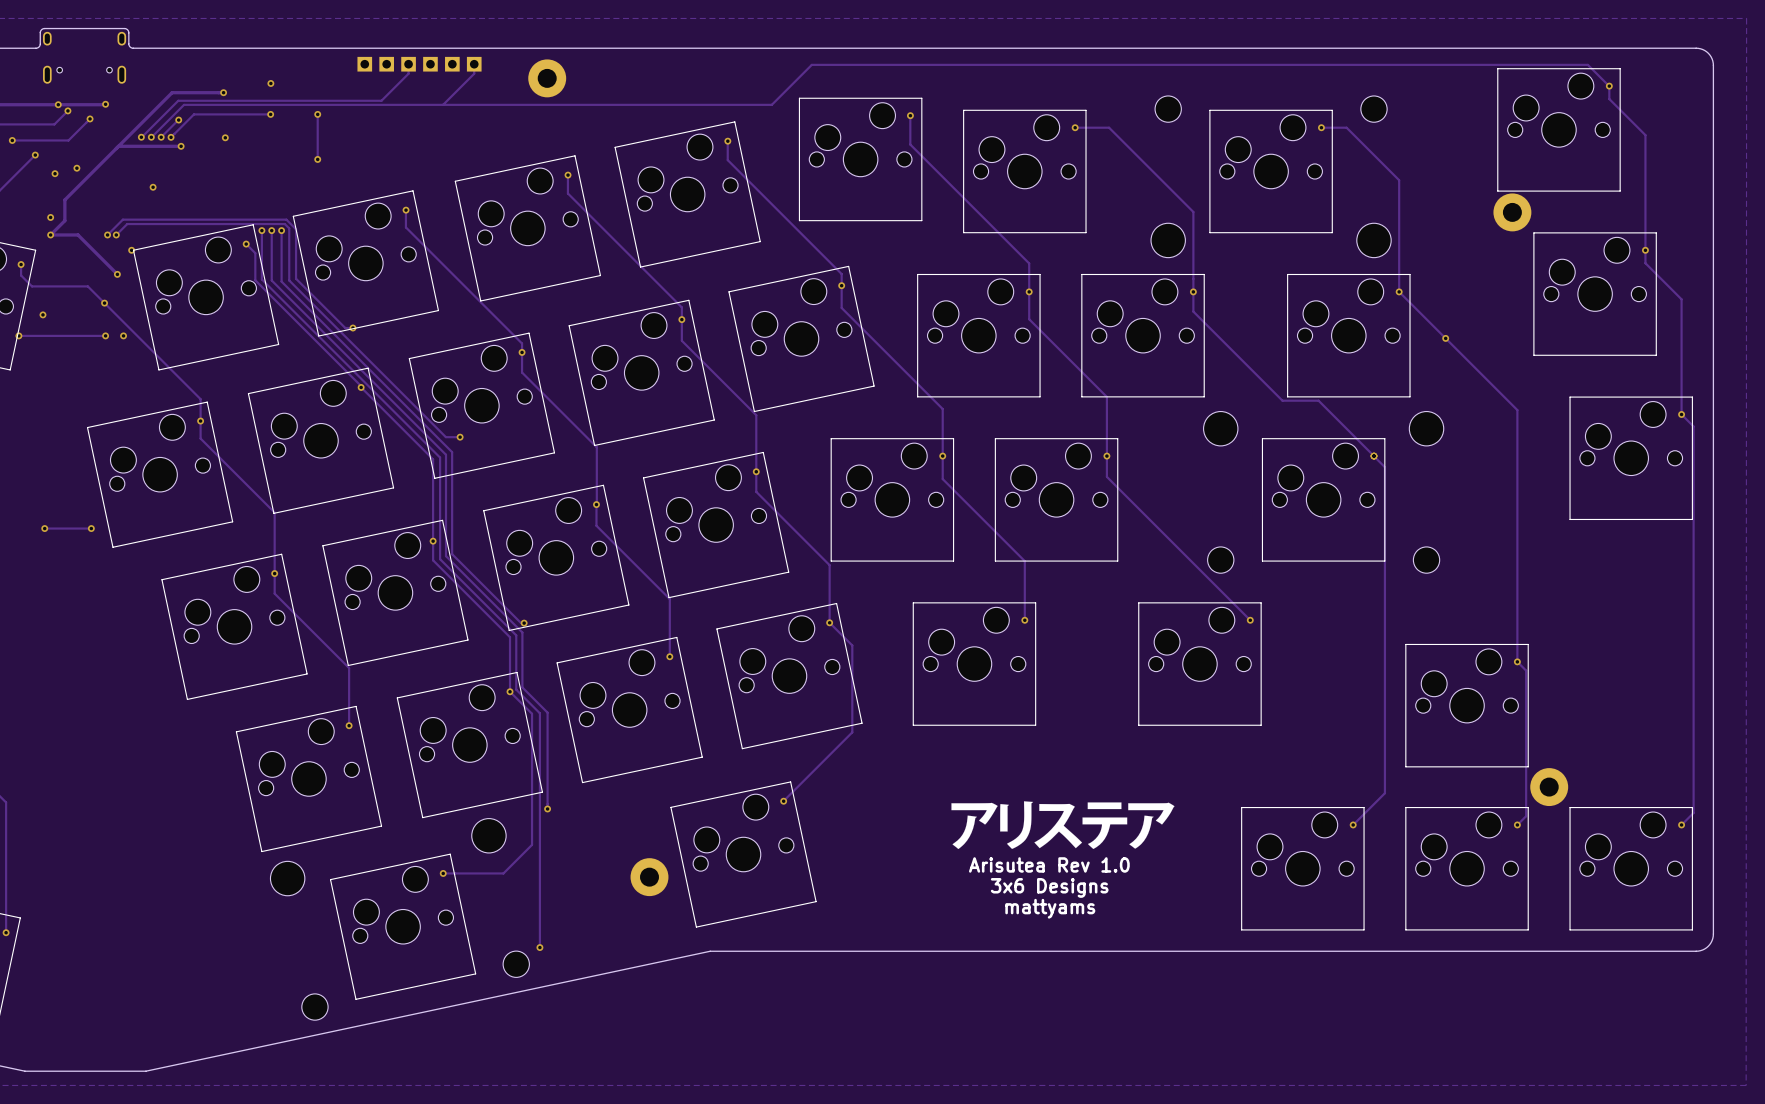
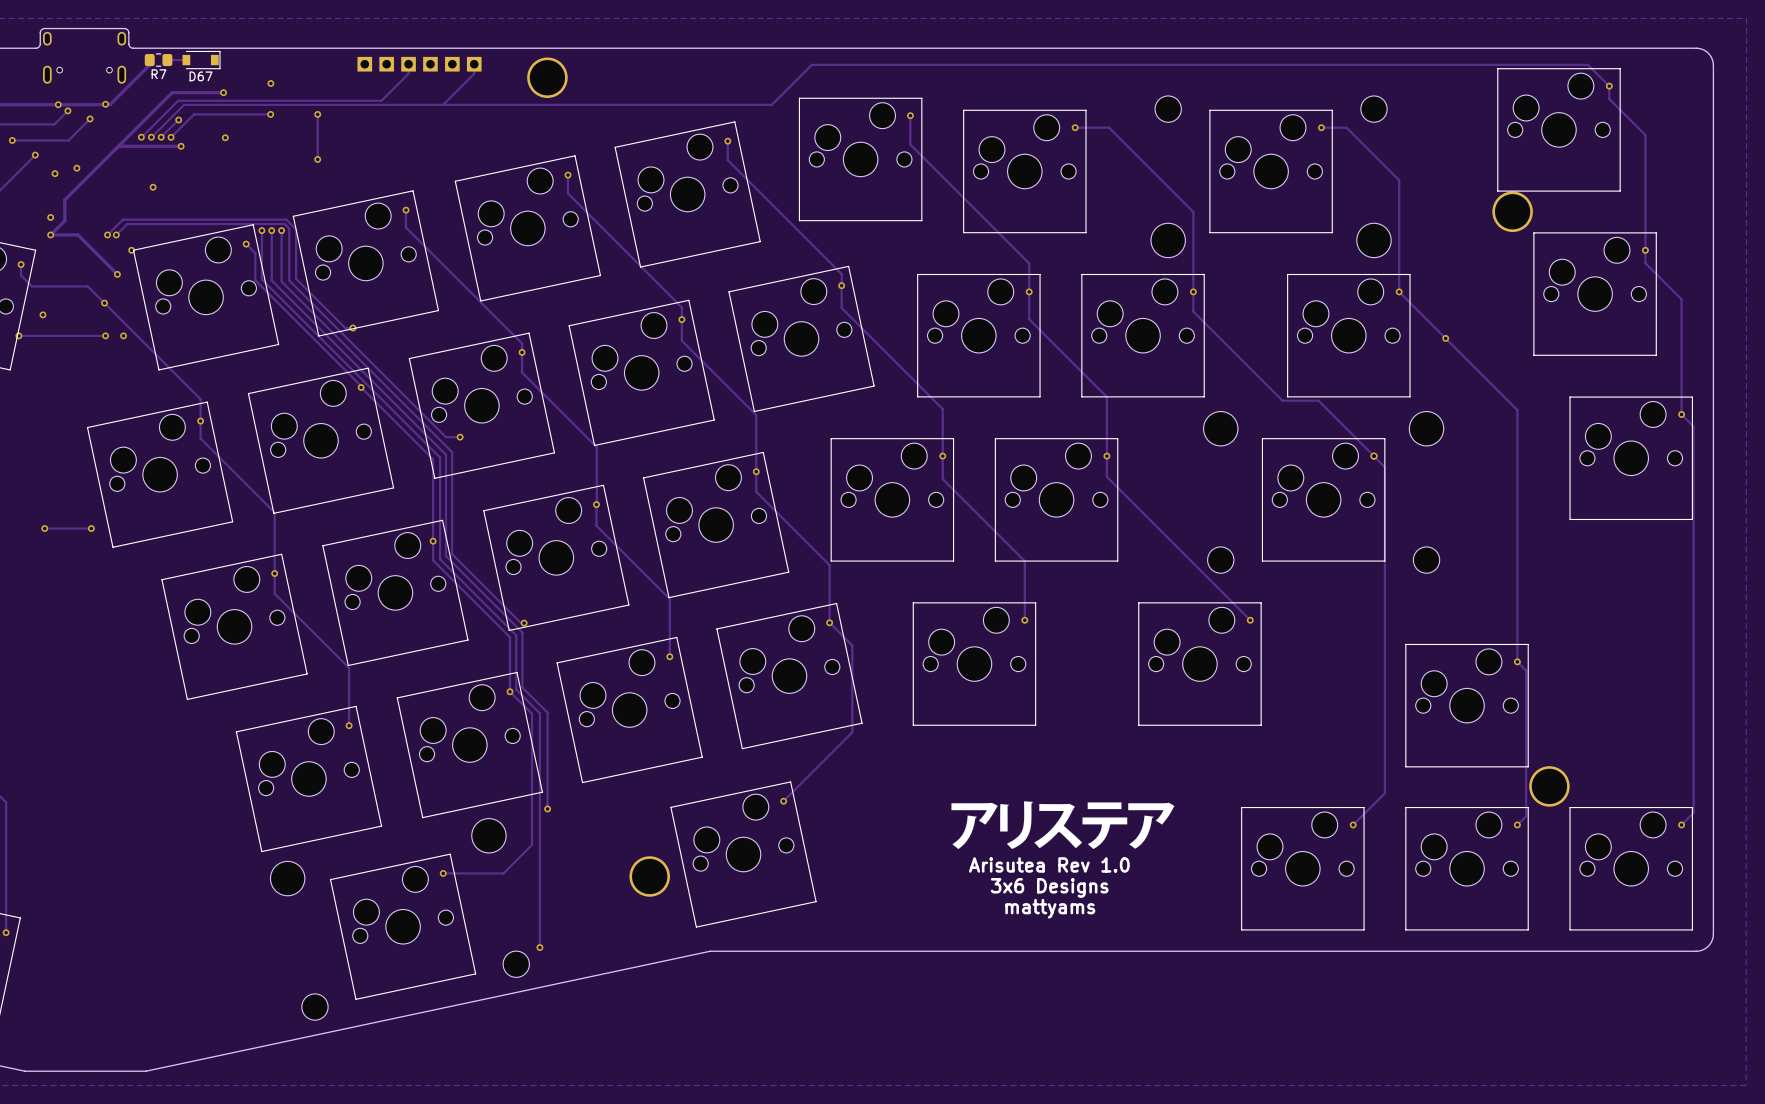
part footprint: [528, 59, 567, 98] -> [527, 57, 568, 98]
track: none -> (149, 60) (149, 65) (110, 104) (105, 104)
R7: none -> (158, 60)
track: none -> (167, 60) (186, 60)
D67: none -> (201, 60)
part footprint: [1493, 193, 1532, 232] -> [1492, 191, 1533, 233]
part footprint: [1530, 768, 1569, 807] -> [1529, 766, 1570, 807]
part footprint: [630, 858, 669, 897] -> [629, 856, 670, 897]

